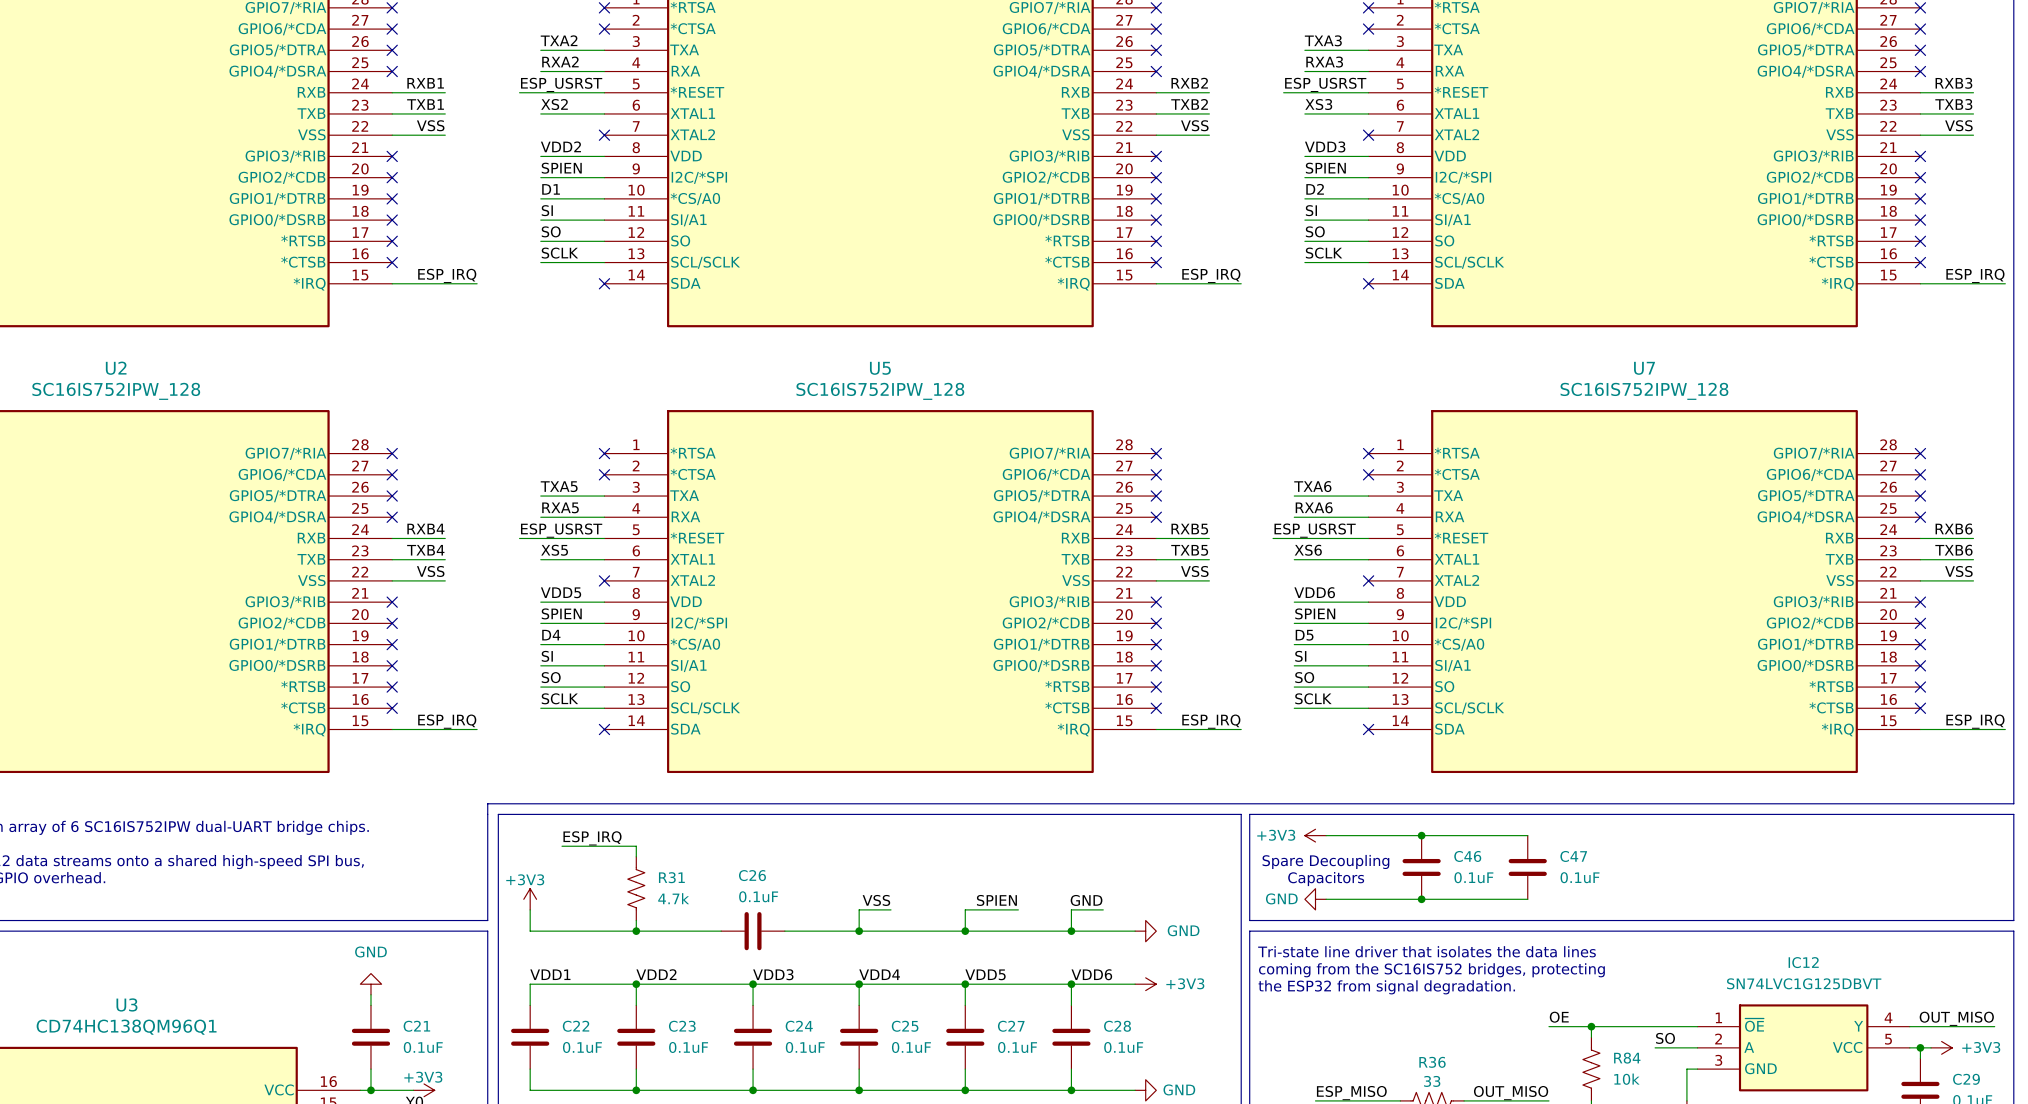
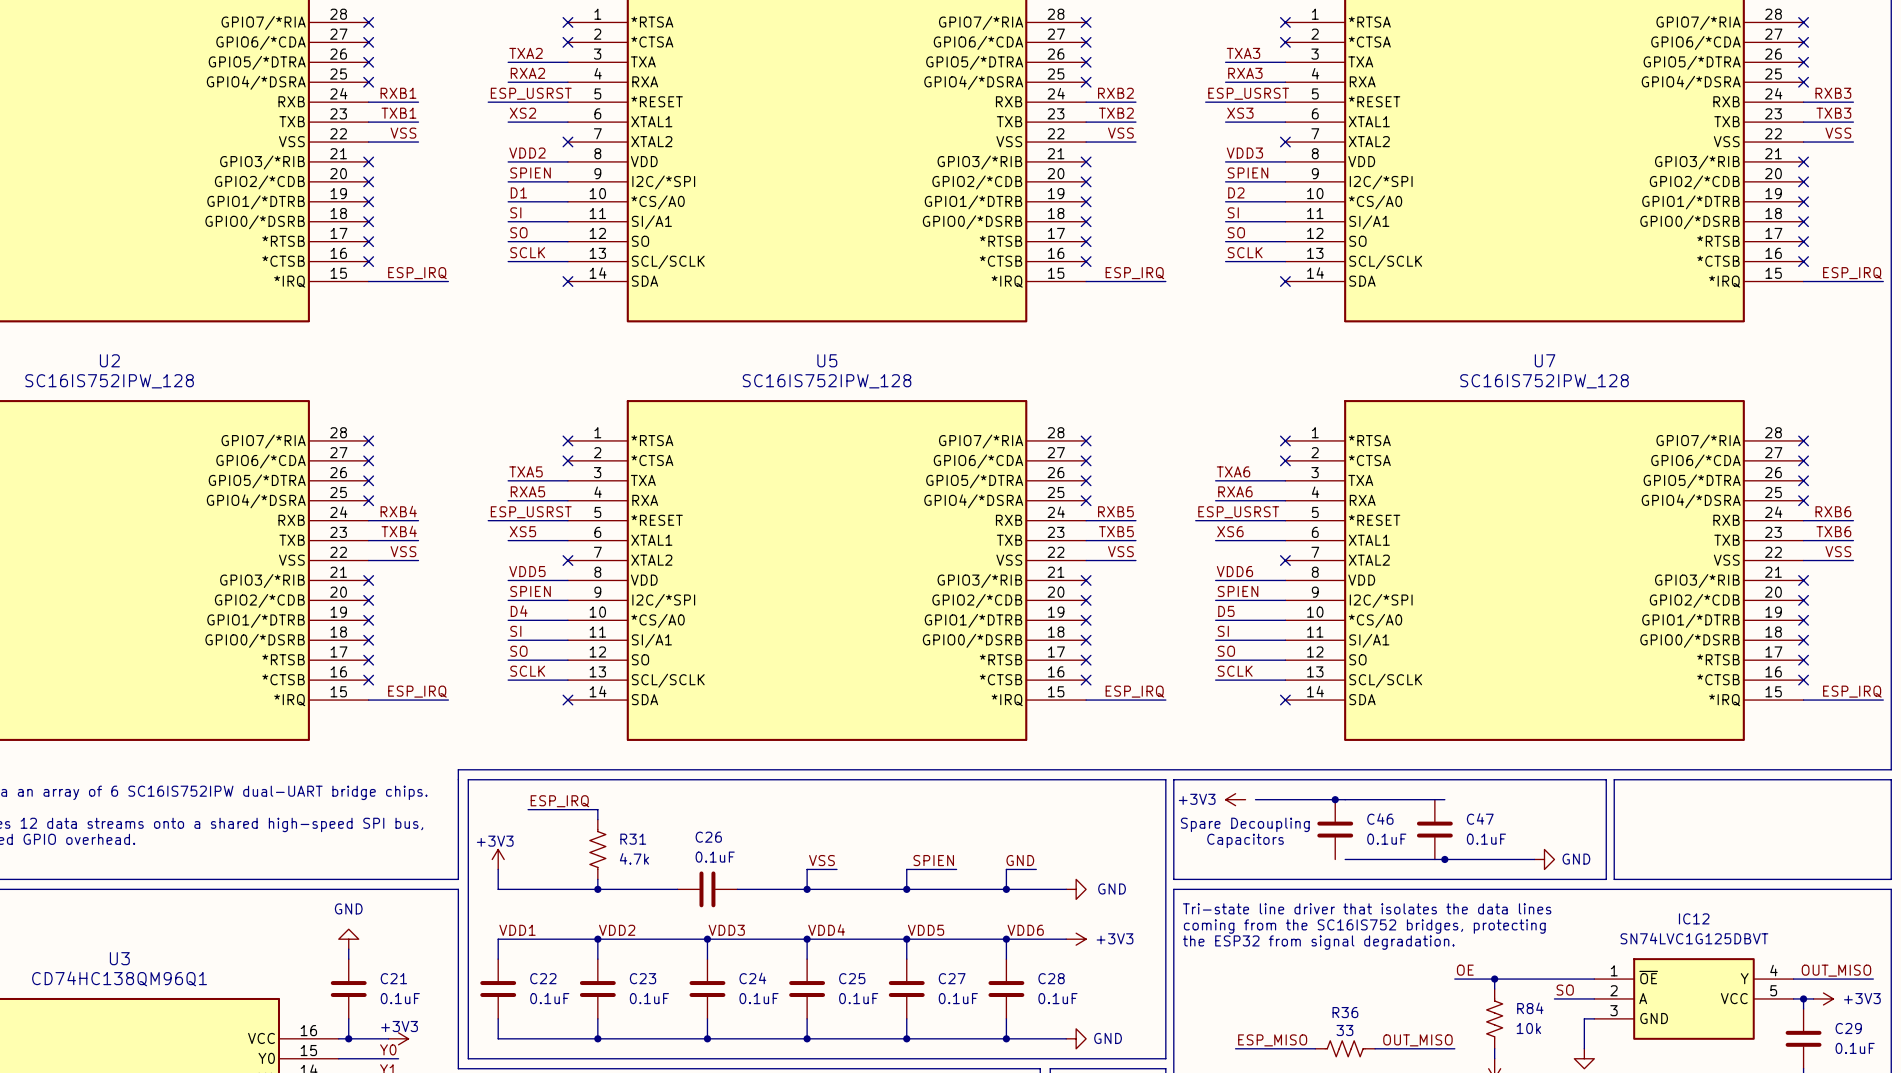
line: (1710, 814) (1718, 814) -> (1606, 779) (1606, 879)
wire: (1326, 835) (1336, 835) -> (1434, 799) (1444, 799)
power symbol: GND (1315, 899) -> none
wire: (1326, 899) (1432, 899) -> (1434, 859) (1534, 859)
junction: (1421, 899) -> none
junction: none -> (1444, 859)
power symbol: none -> GND (1544, 859)
line: (1710, 920) (1718, 920) -> (1614, 779) (1614, 879)

